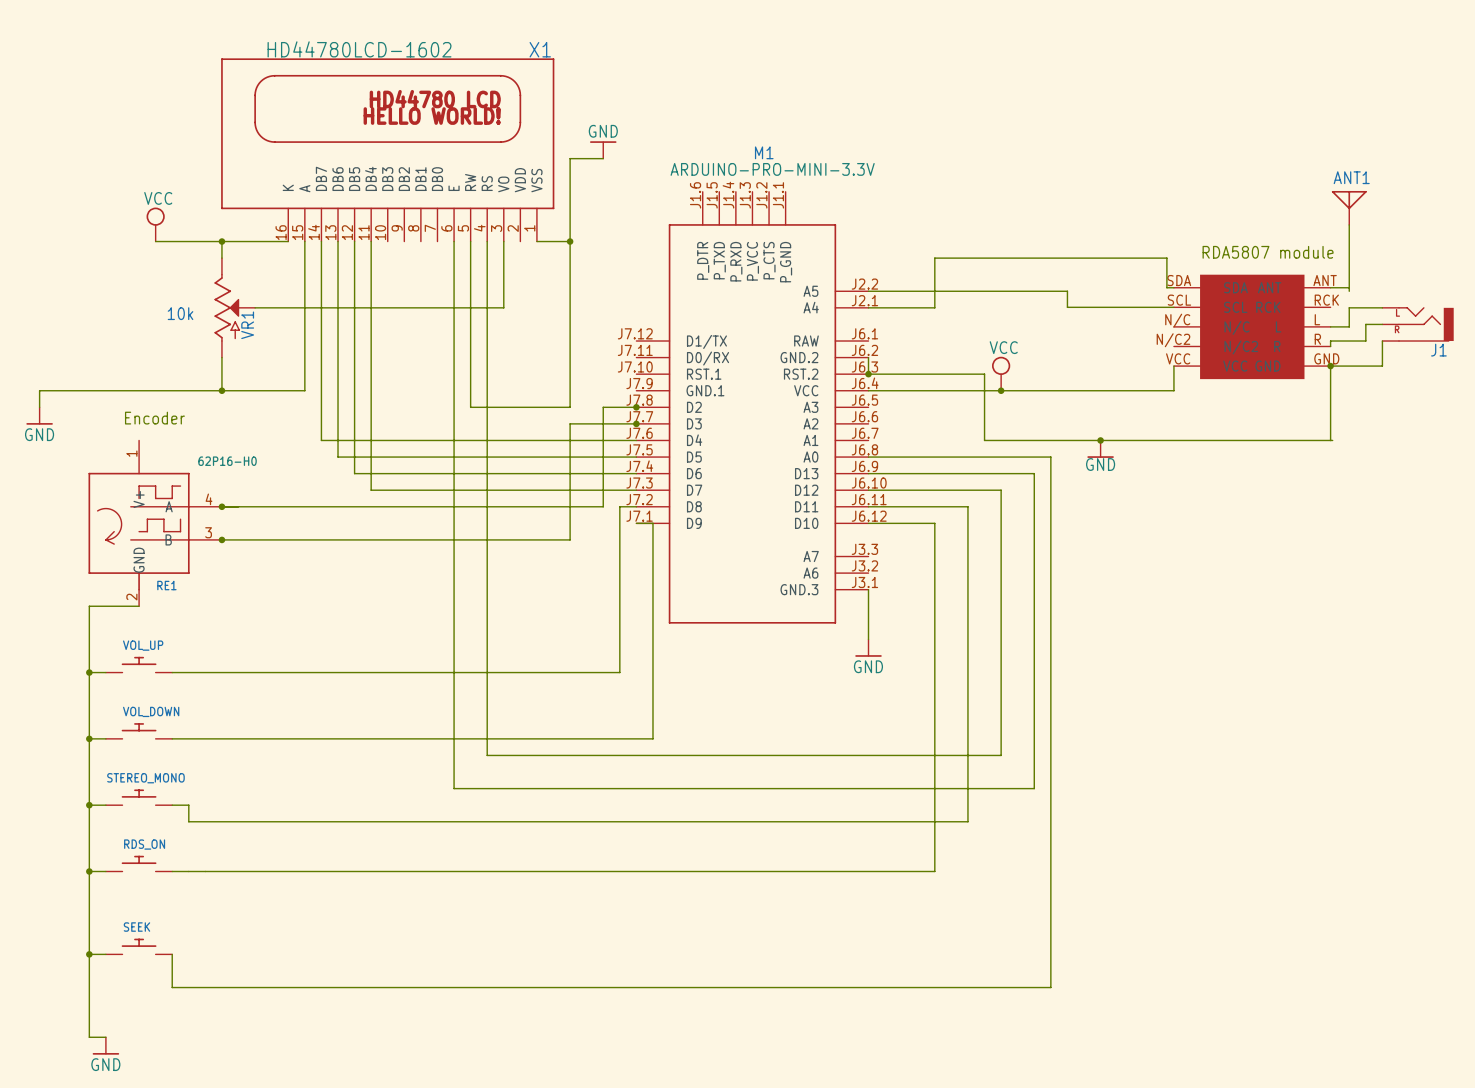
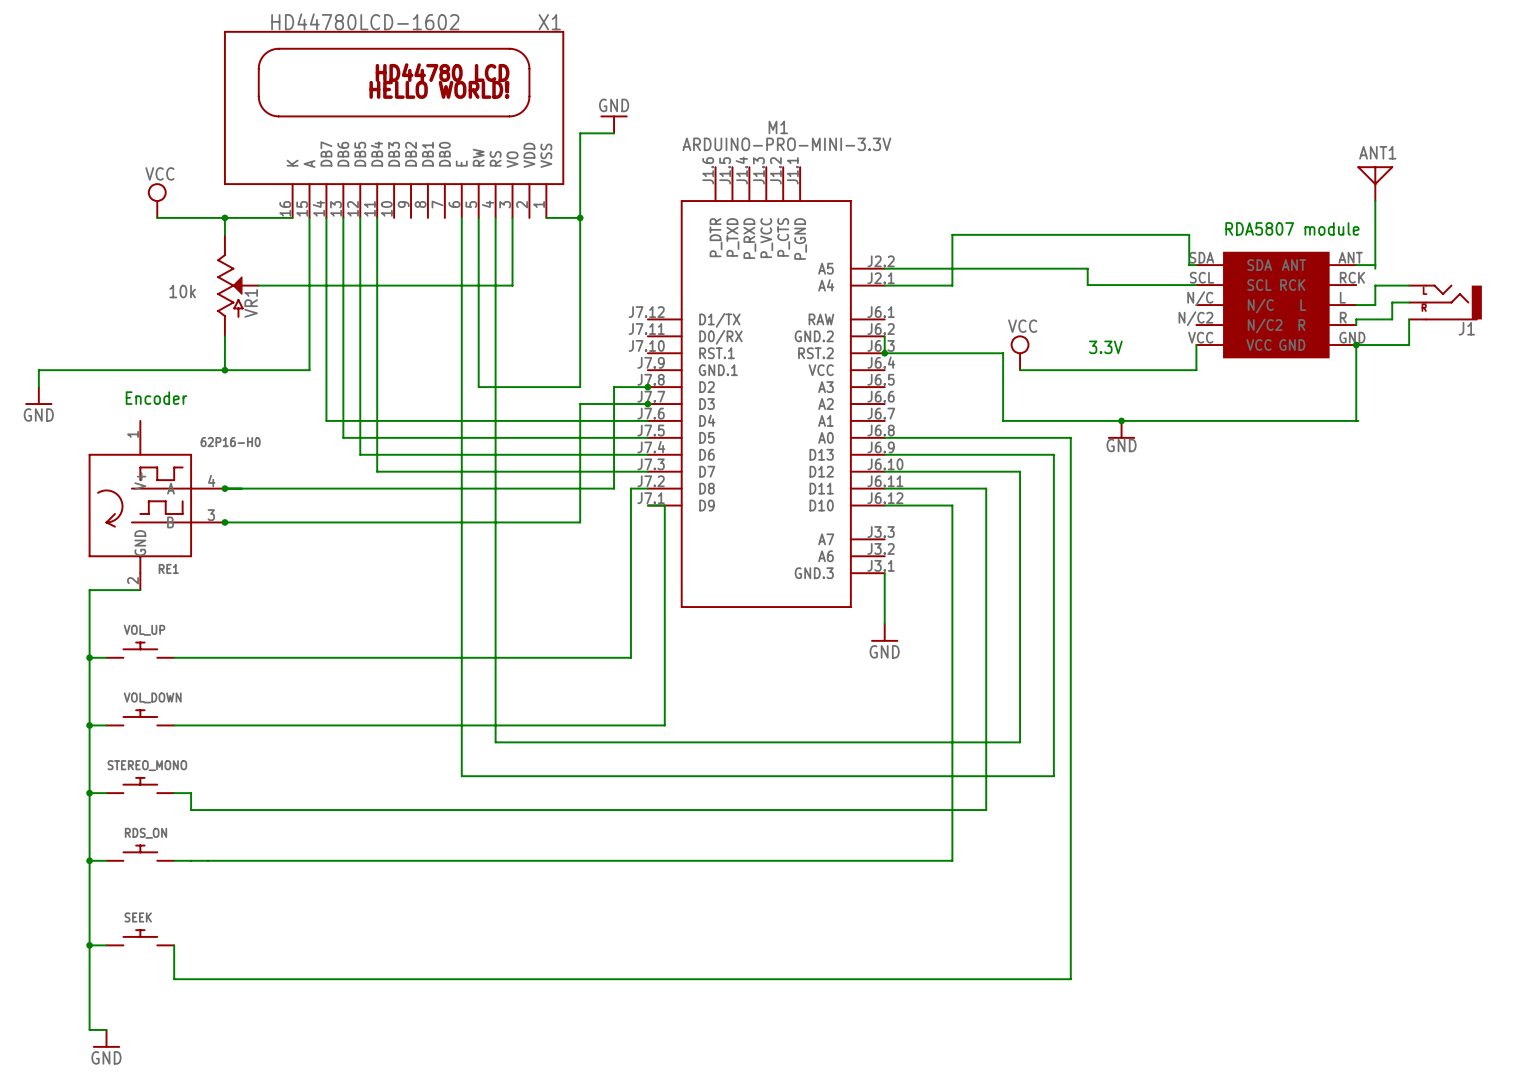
text: none -> 3.3V (1105, 347)
wire: (868, 390) (1001, 390) -> none
junction: (1001, 390) -> none

